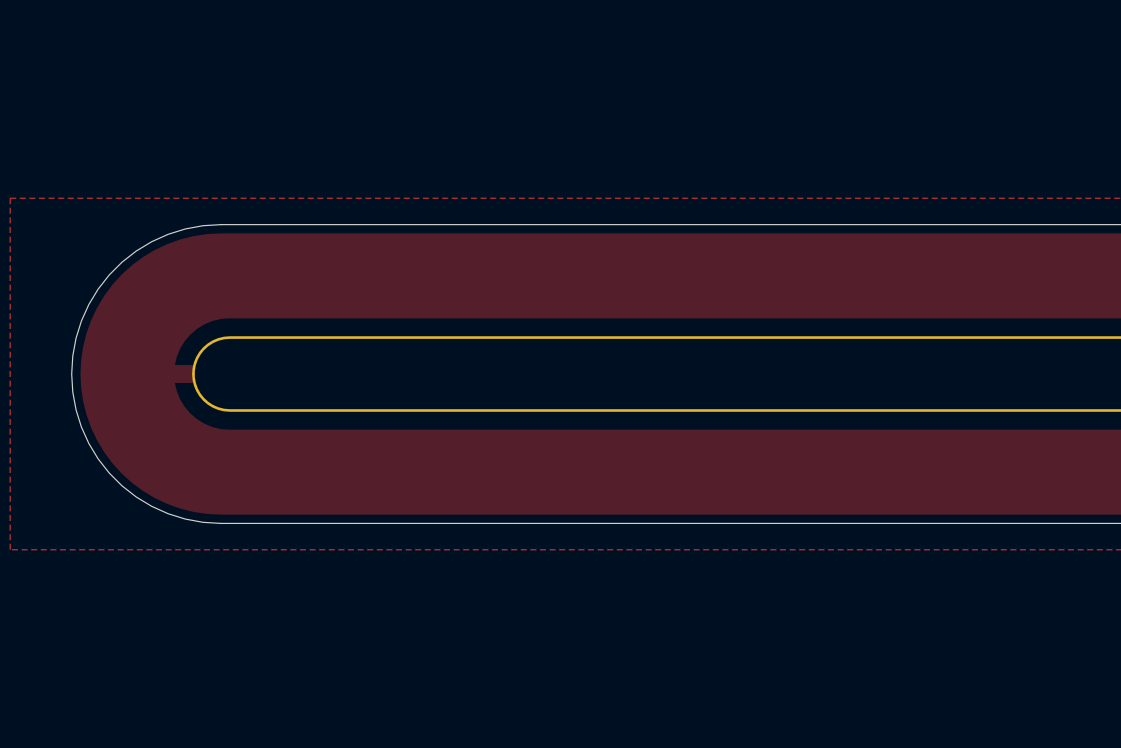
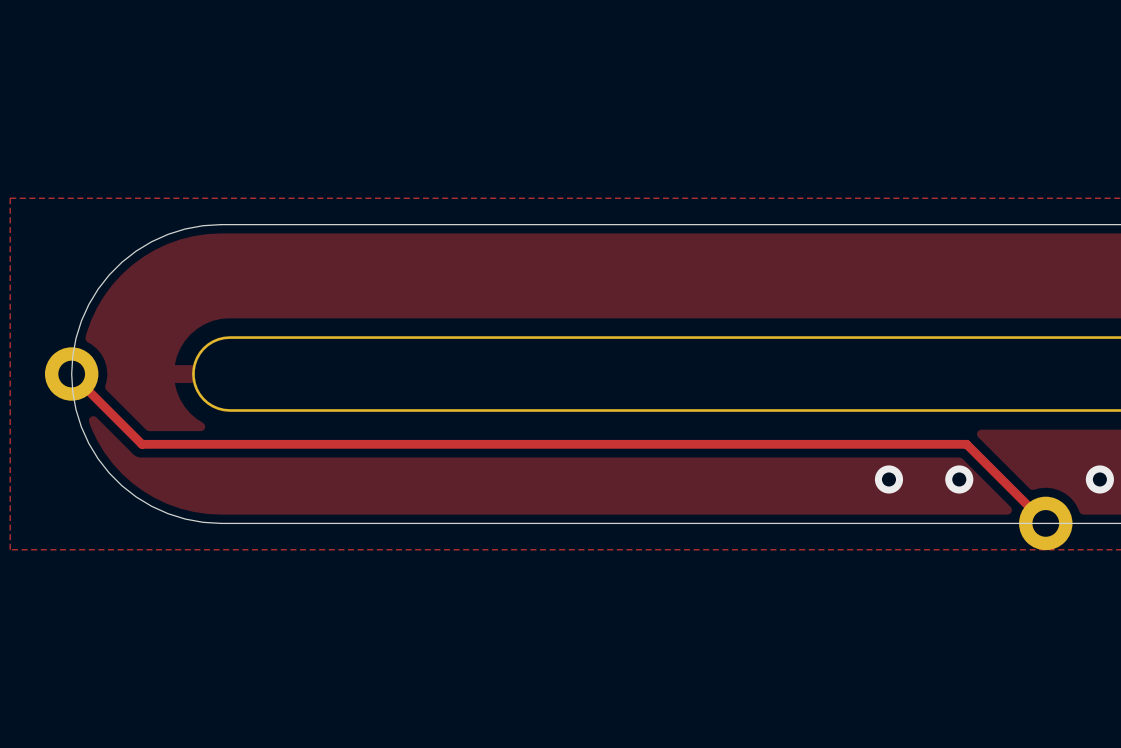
track: none -> (71, 374) (141, 444) (966, 444) (1045, 523)
part: none -> (71, 374)
via: none -> (888, 479)
via: none -> (959, 479)
via: none -> (1099, 479)
part: none -> (1045, 523)

